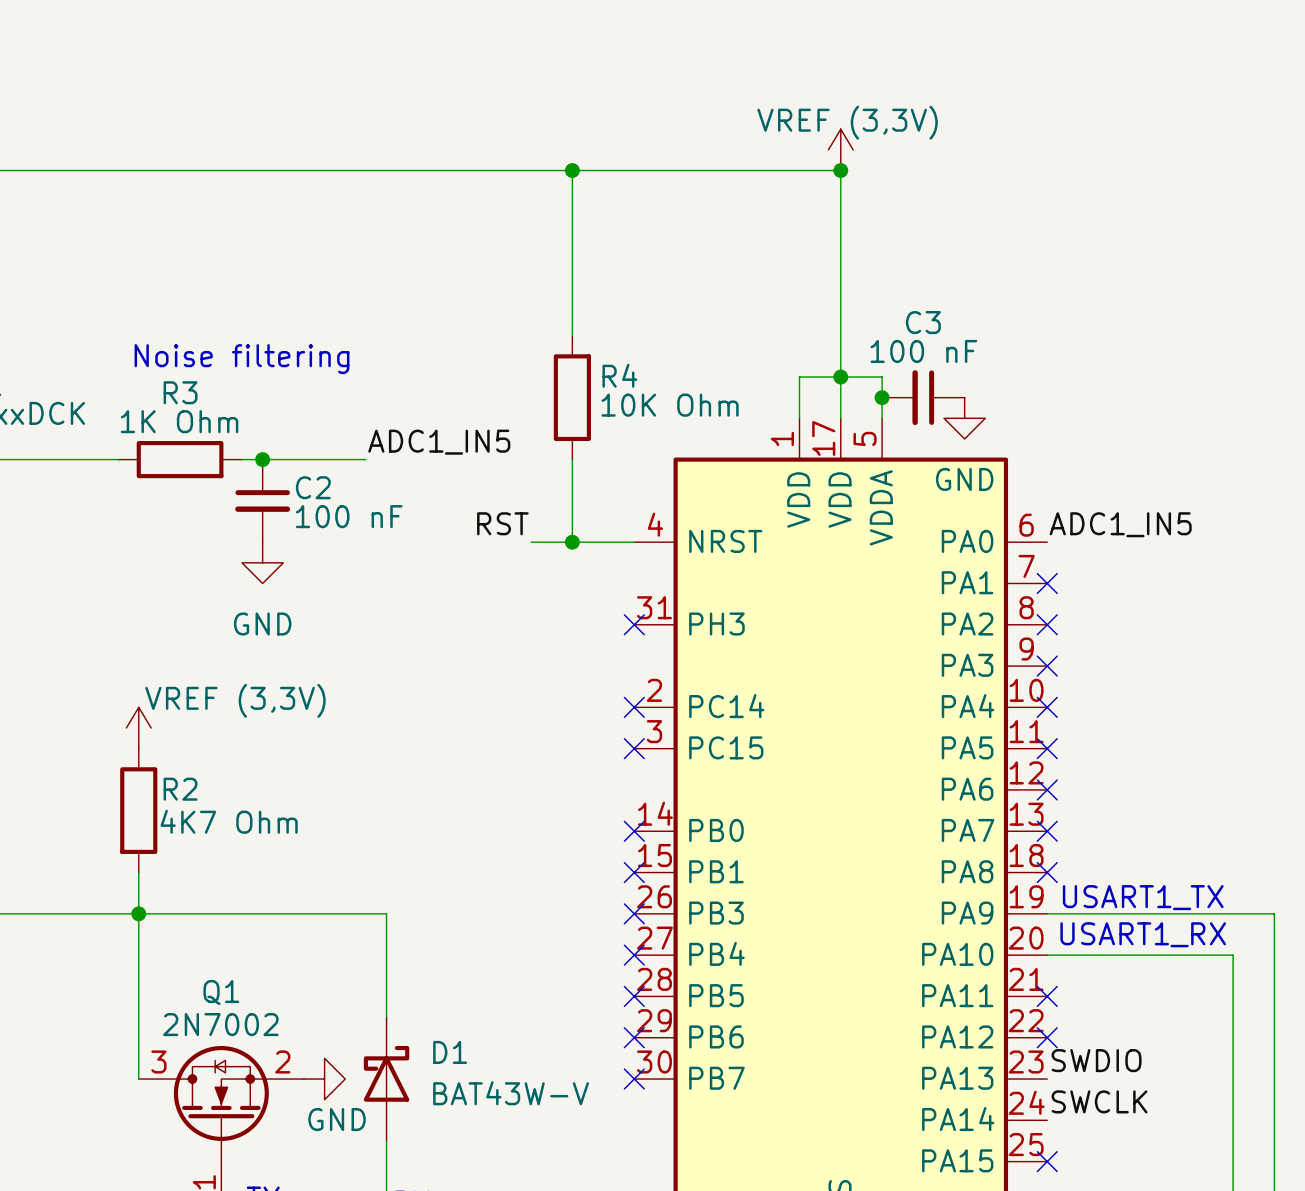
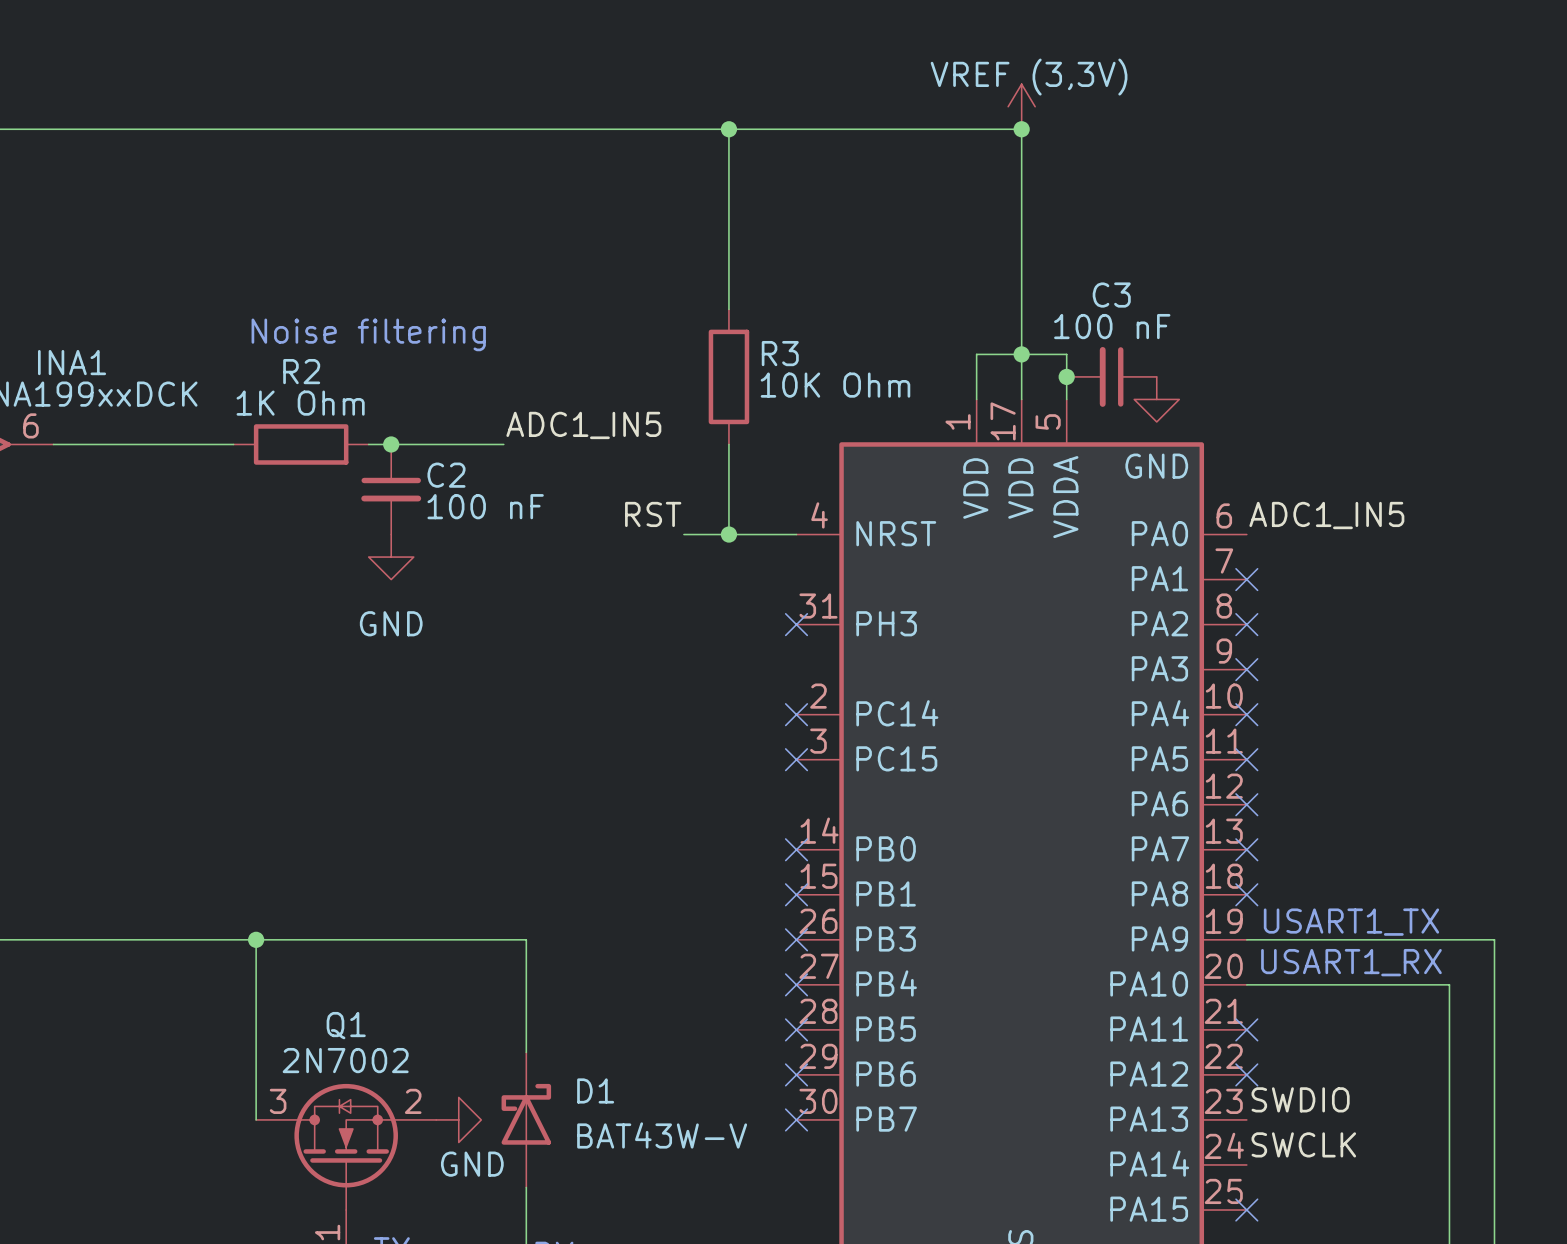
R4 name: R4 (619, 375) -> R3 (780, 353)
R3 name: R3 (180, 392) -> R2 (301, 371)
power symbol: VREF (3,3V) (138, 728) -> none
R2: 4K7 Ohm (138, 810) -> none
wire: (138, 872) (138, 913) -> none

